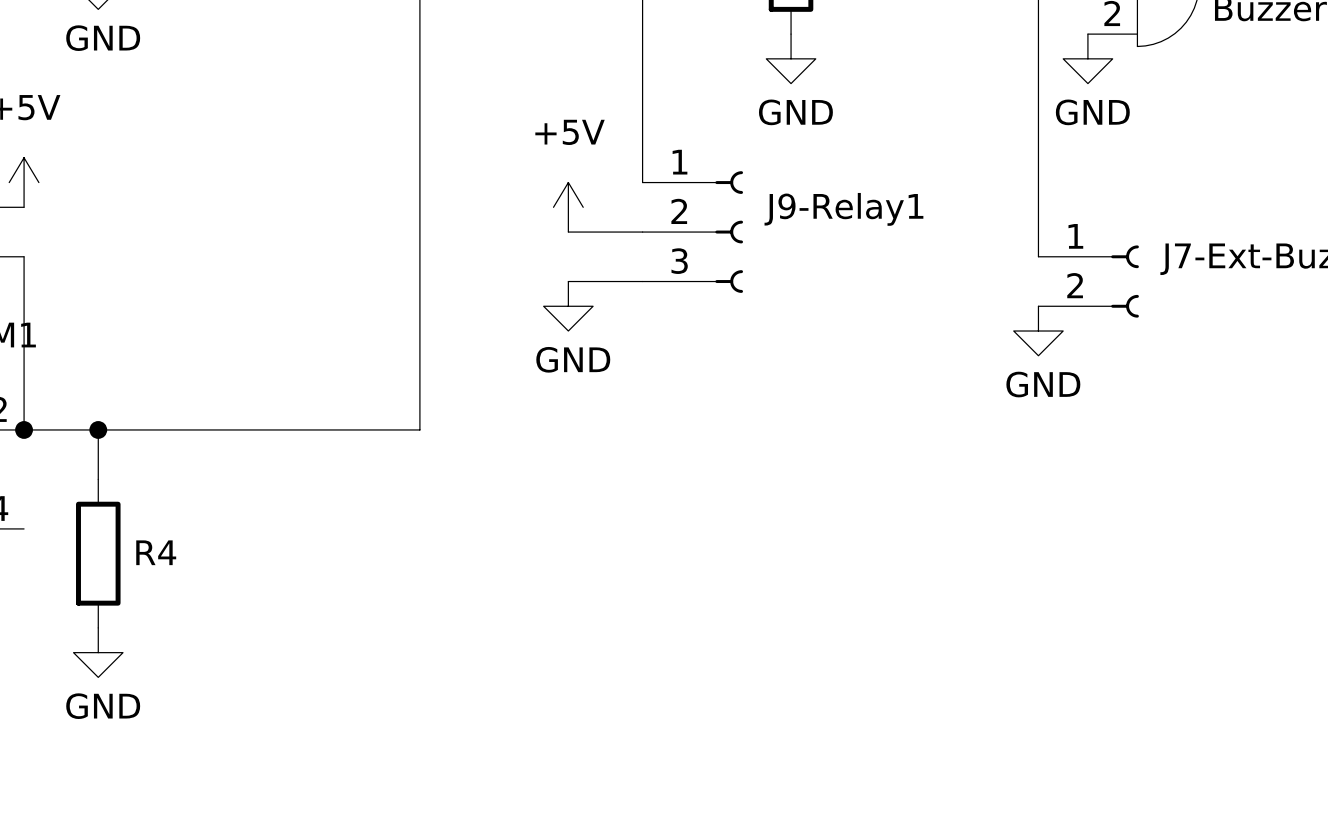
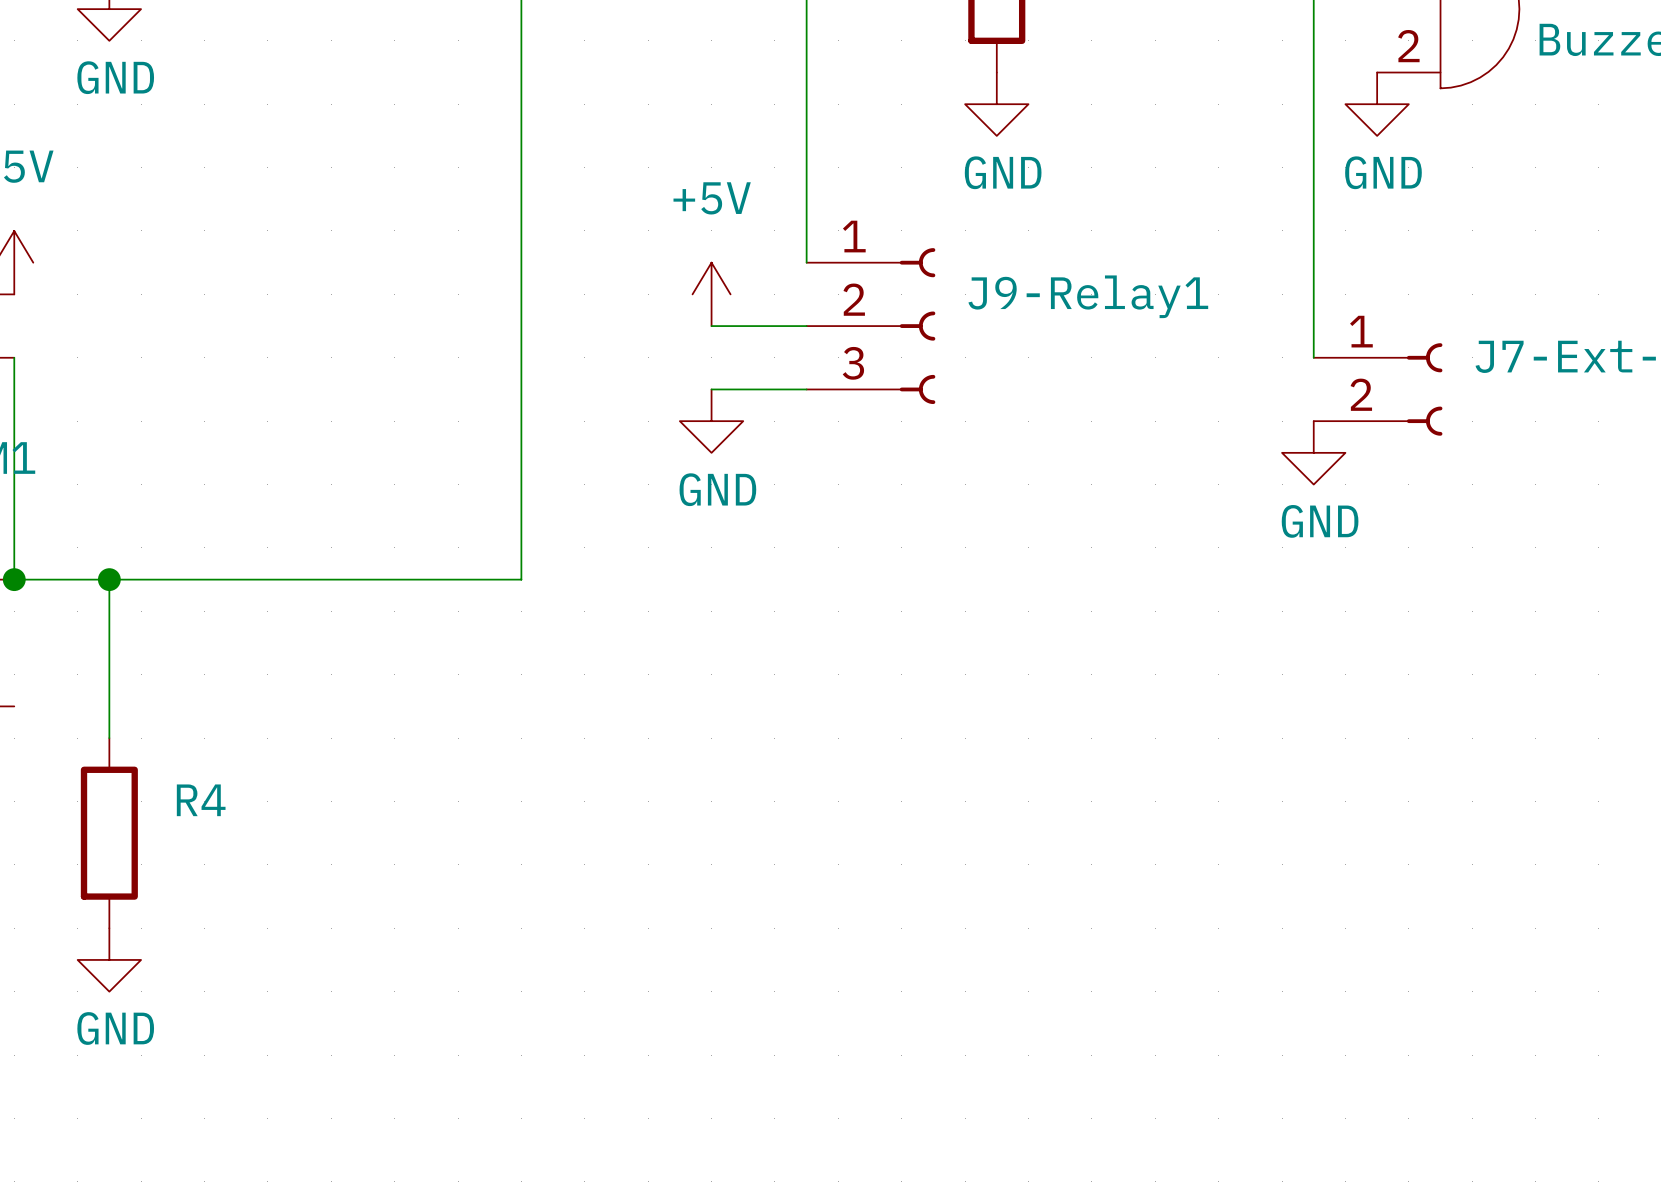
wire: none -> (109, 643) (109, 738)
R4 name position: R4 (156, 552) -> R4 (201, 800)
R4 position: (98, 553) -> (109, 833)
power symbol position: GND (98, 652) -> GND (109, 959)

